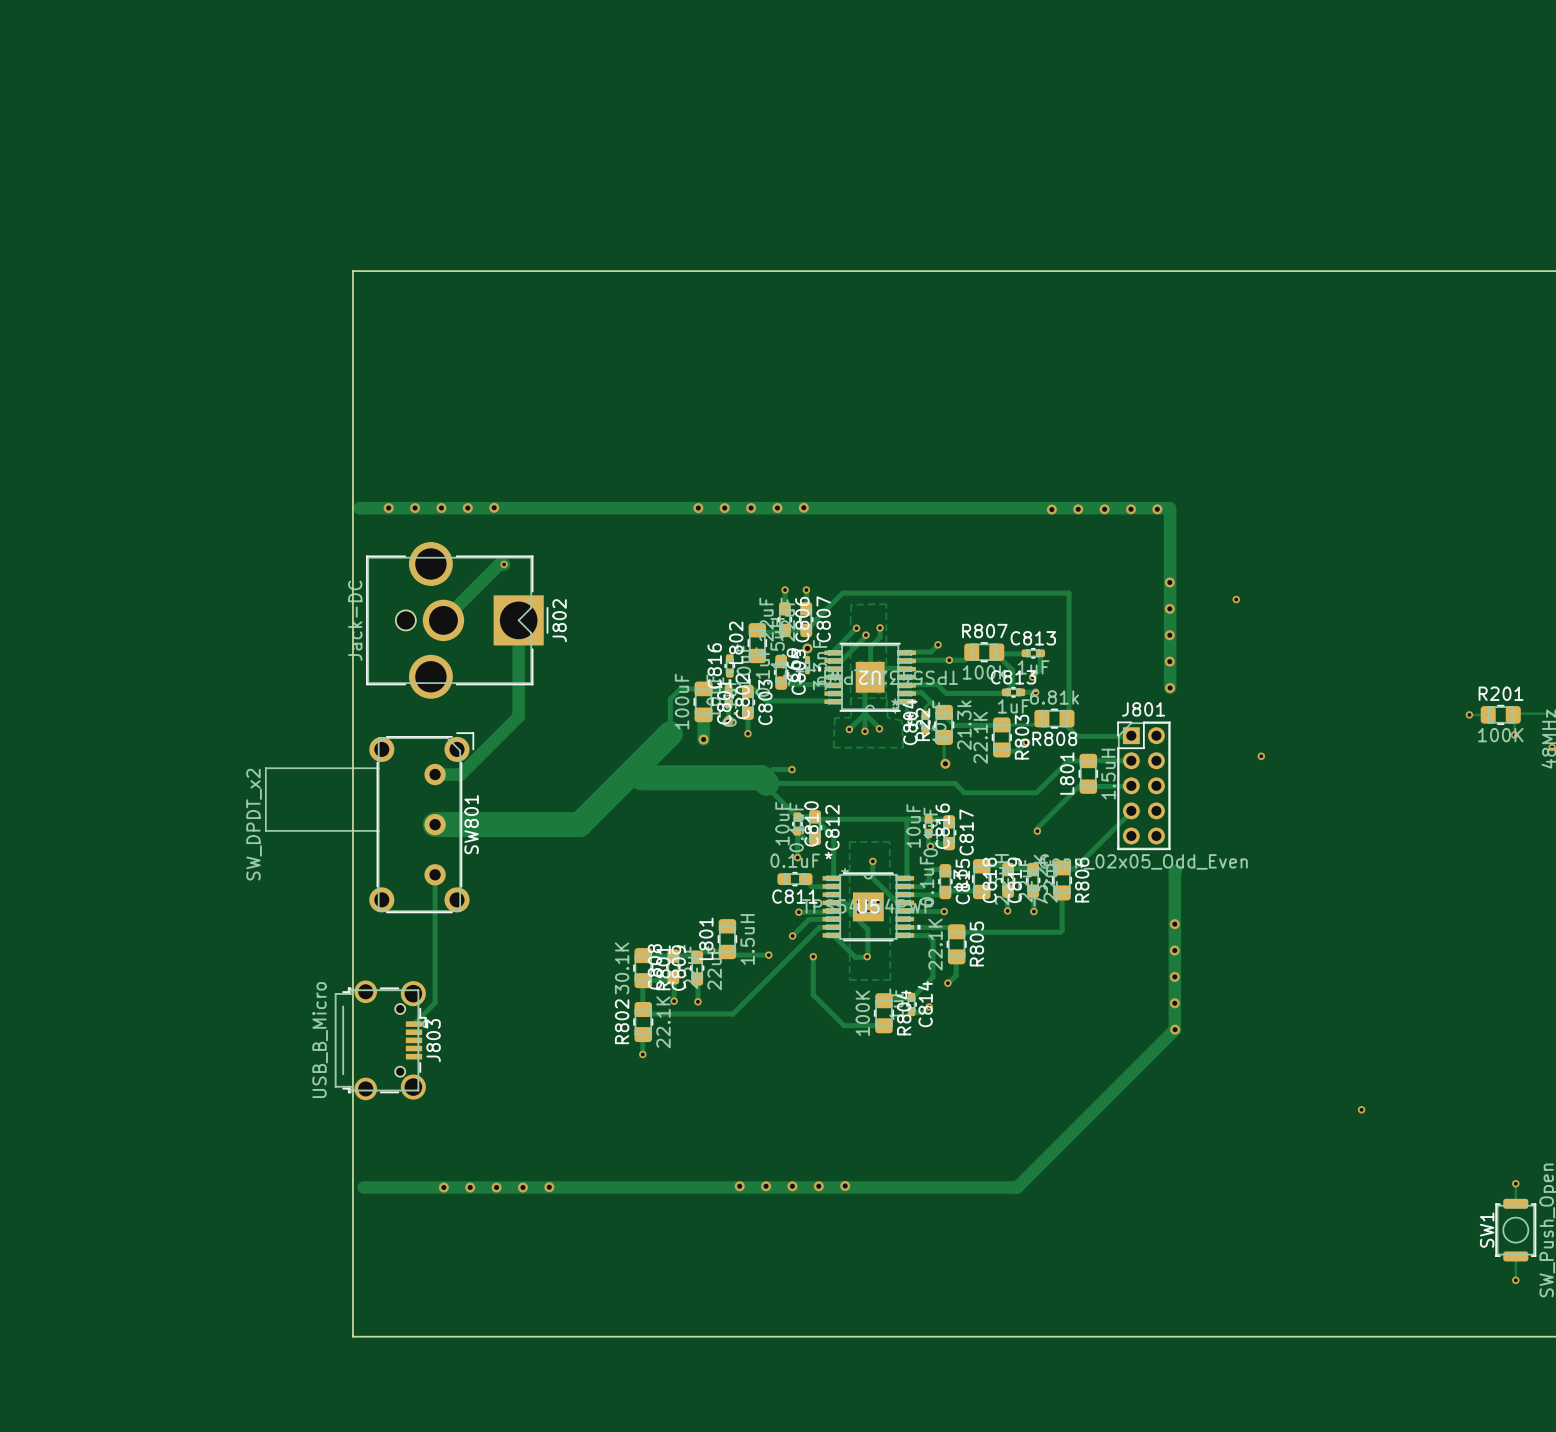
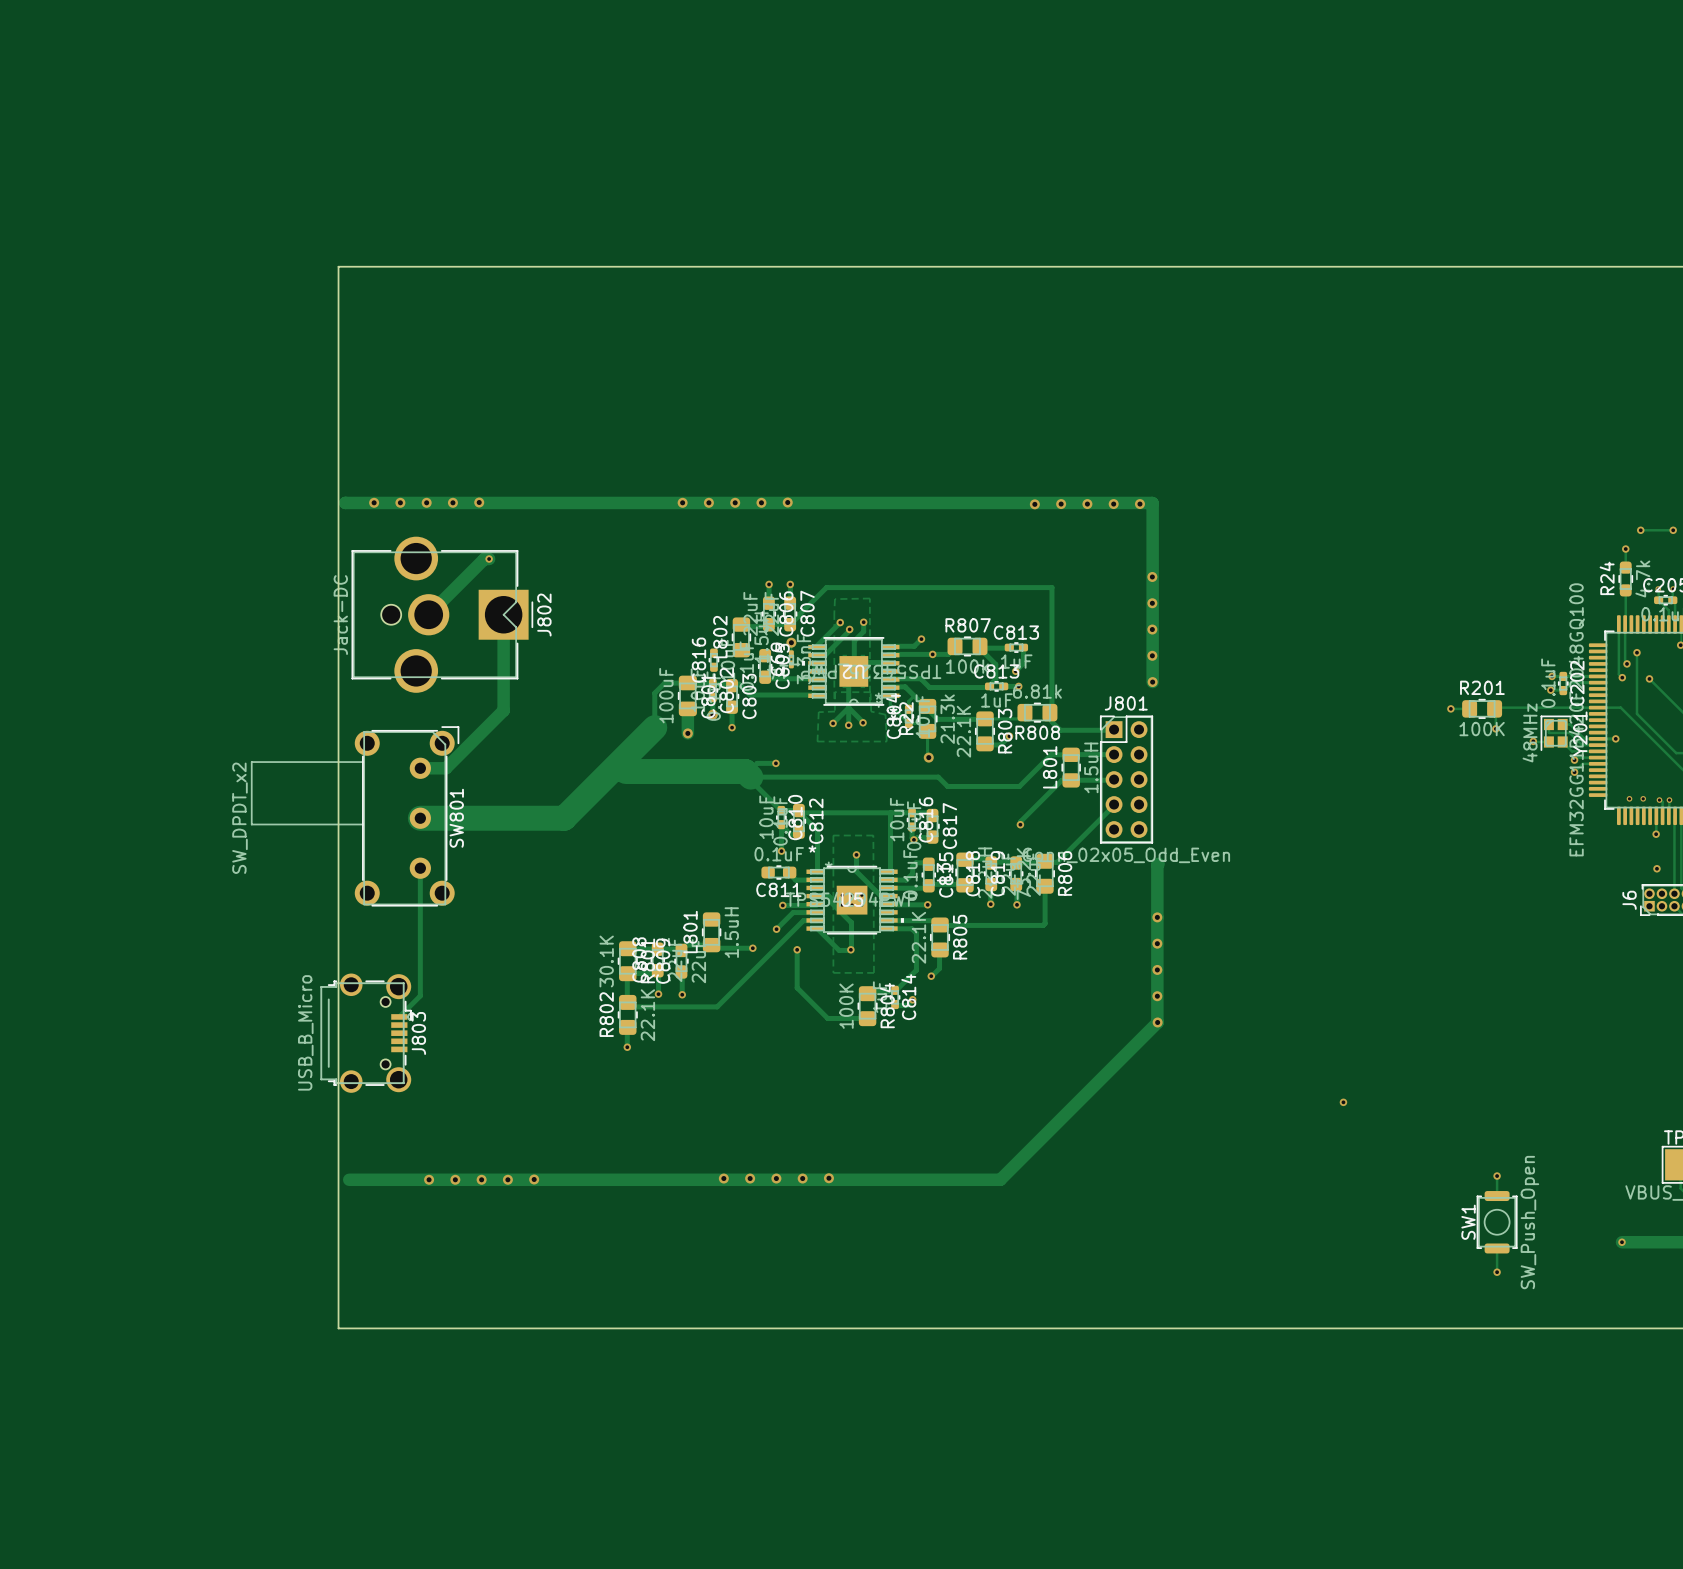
via: (1236, 599) -> none
via: (1261, 756) -> none

